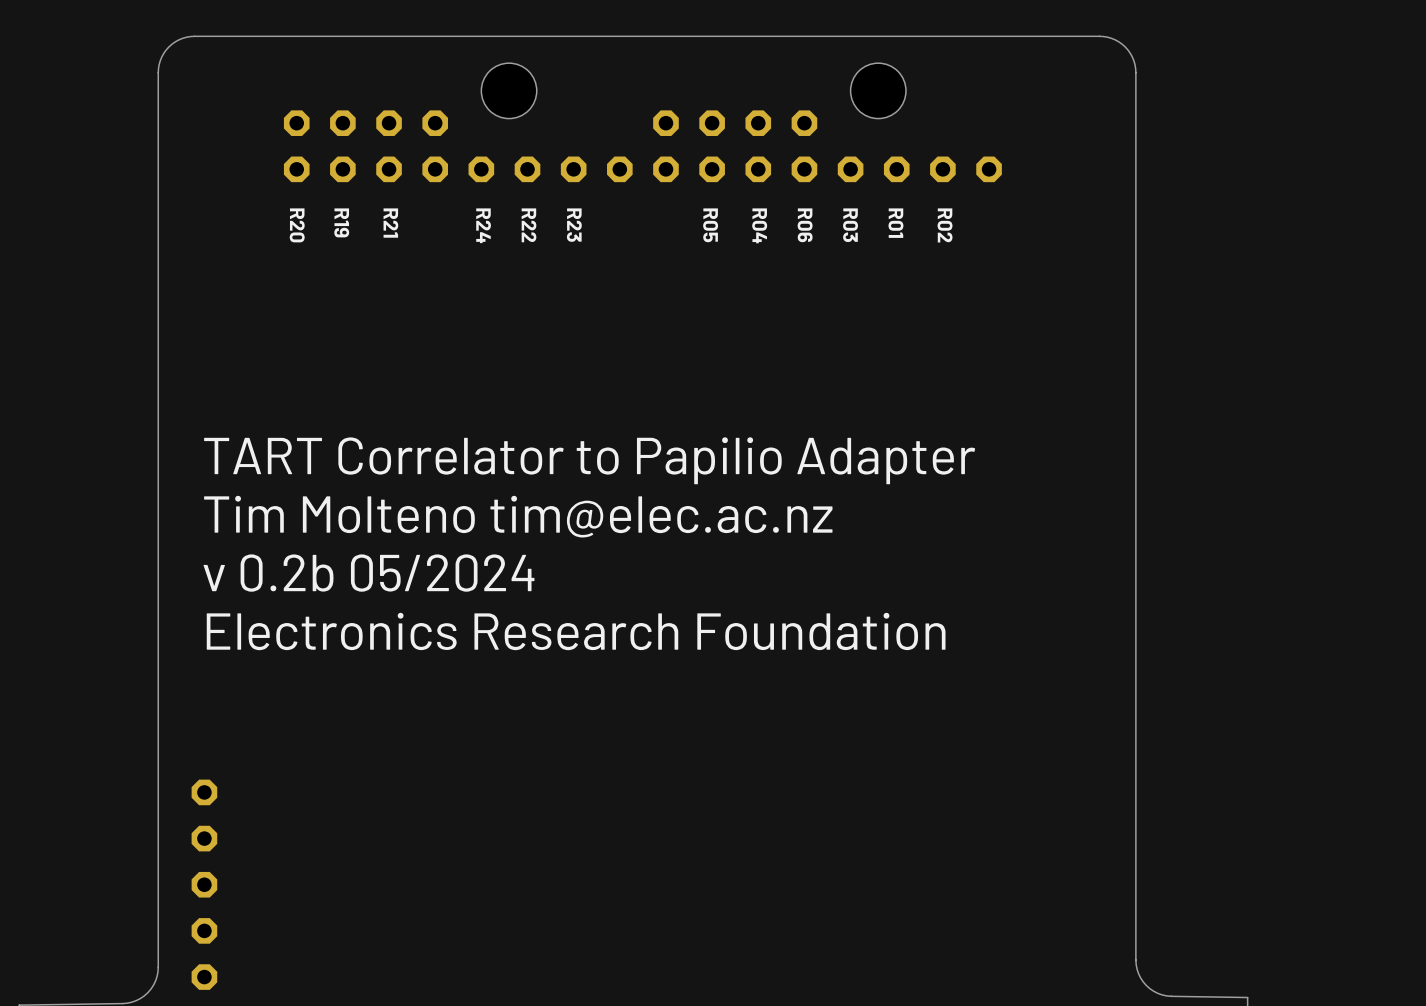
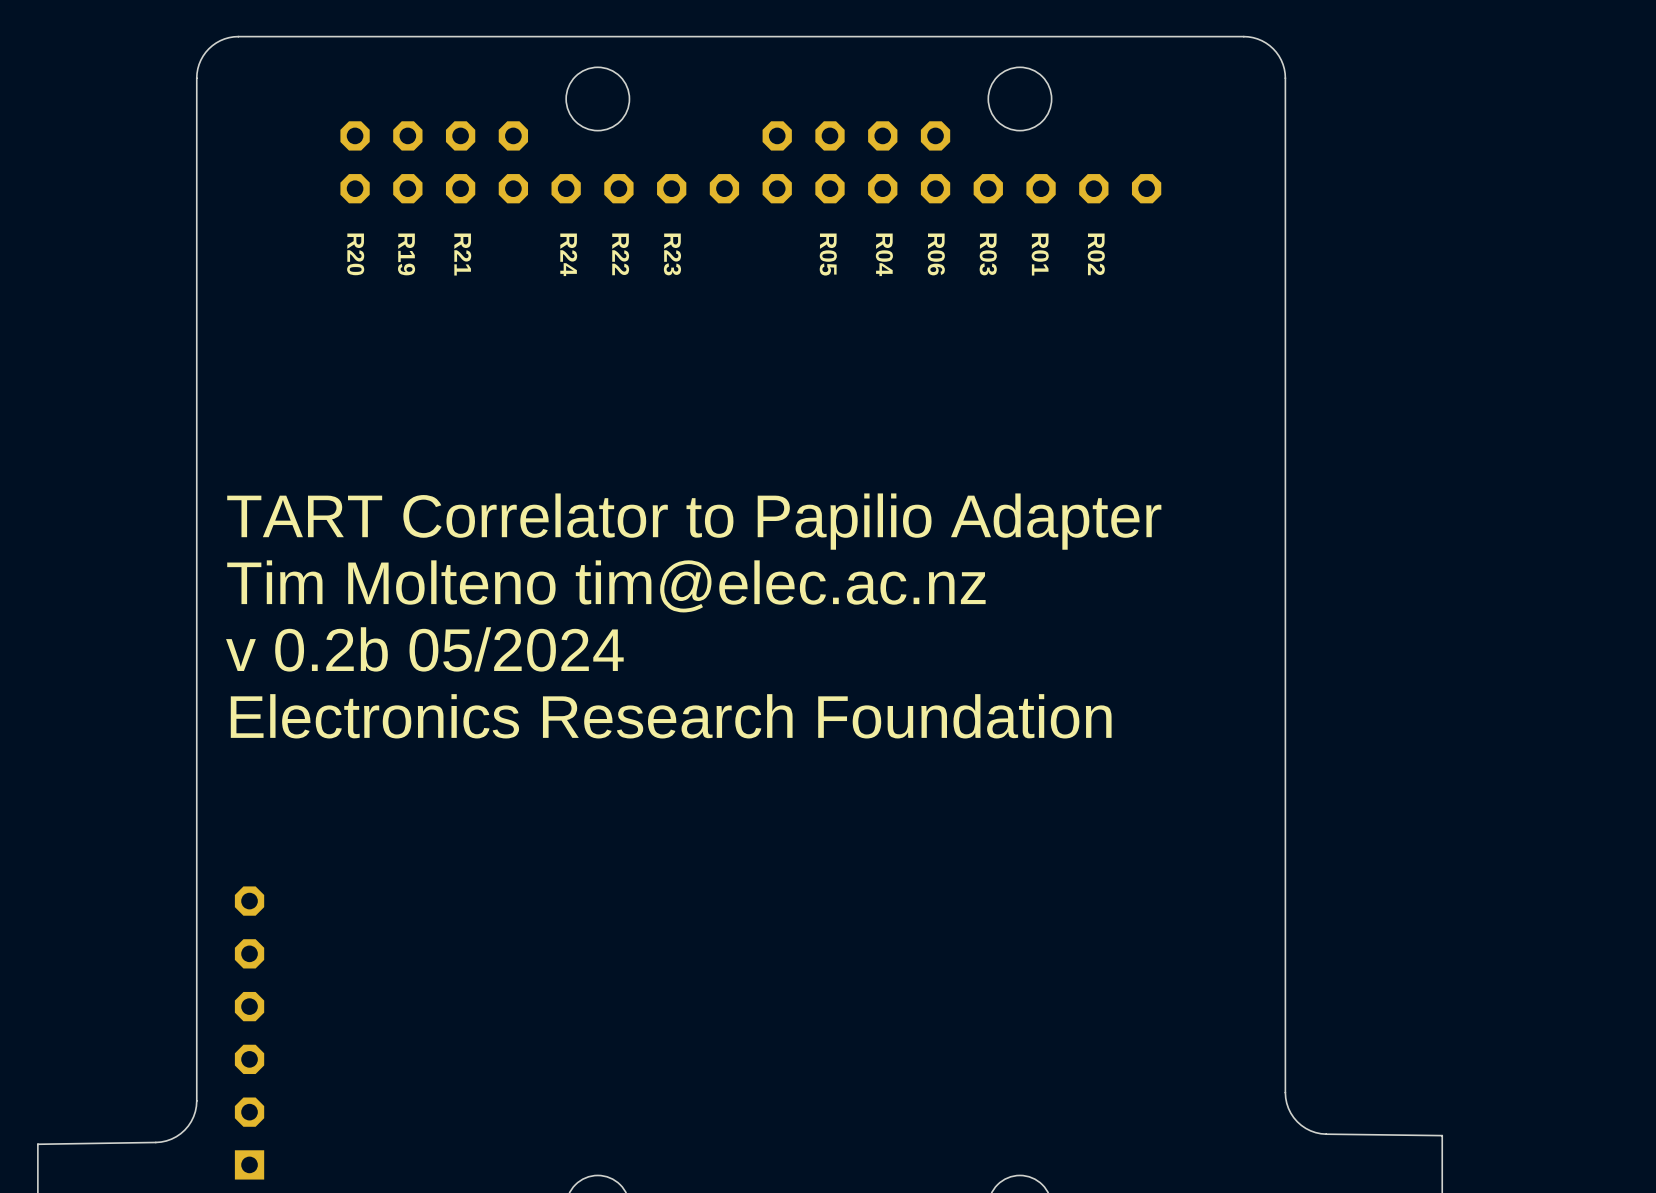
board edge: (1074, 36) (1103, 36) (1115, 39) (1127, 50) (1135, 68) (1136, 964) (1138, 973) (1146, 985) (1162, 994) (1247, 997) -> (1243, 36) (1261, 40) (1273, 48) (1283, 64) (1285, 78) (1285, 1098) (1290, 1113) (1297, 1121) (1315, 1132) (1442, 1135)
text position: TART Correlator to Papilio Adapter (589, 460) -> TART Correlator to Papilio Adapter (694, 521)
text position: Tim Molteno tim@elec.ac.nz (518, 516) -> Tim Molteno tim@elec.ac.nz (606, 586)
text position: v 0.2b 05/2024 (369, 573) -> v 0.2b 05/2024 (424, 649)
text position: Electronics Research Foundation (576, 631) -> Electronics Research Foundation (671, 716)

